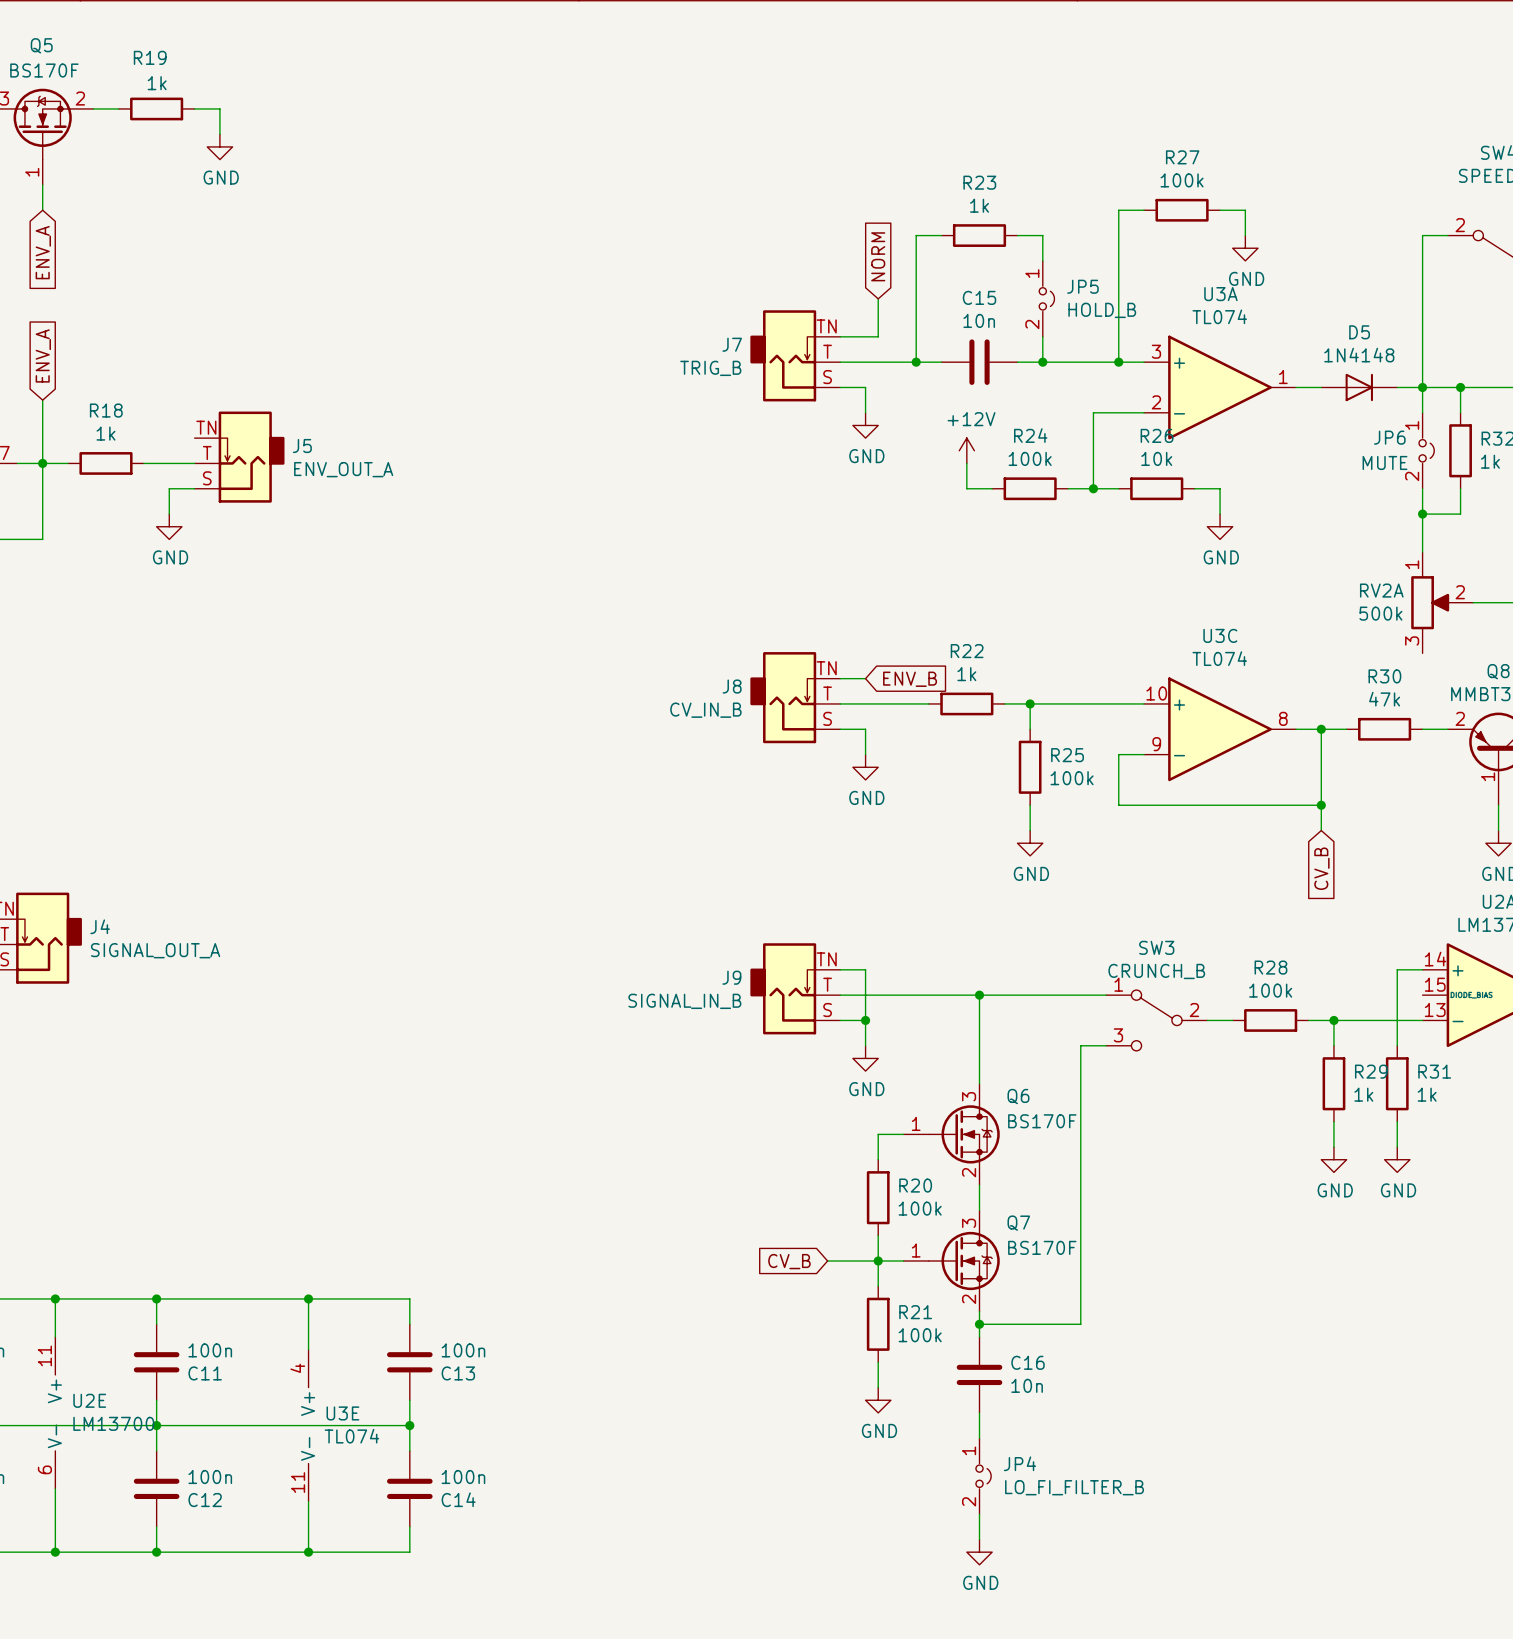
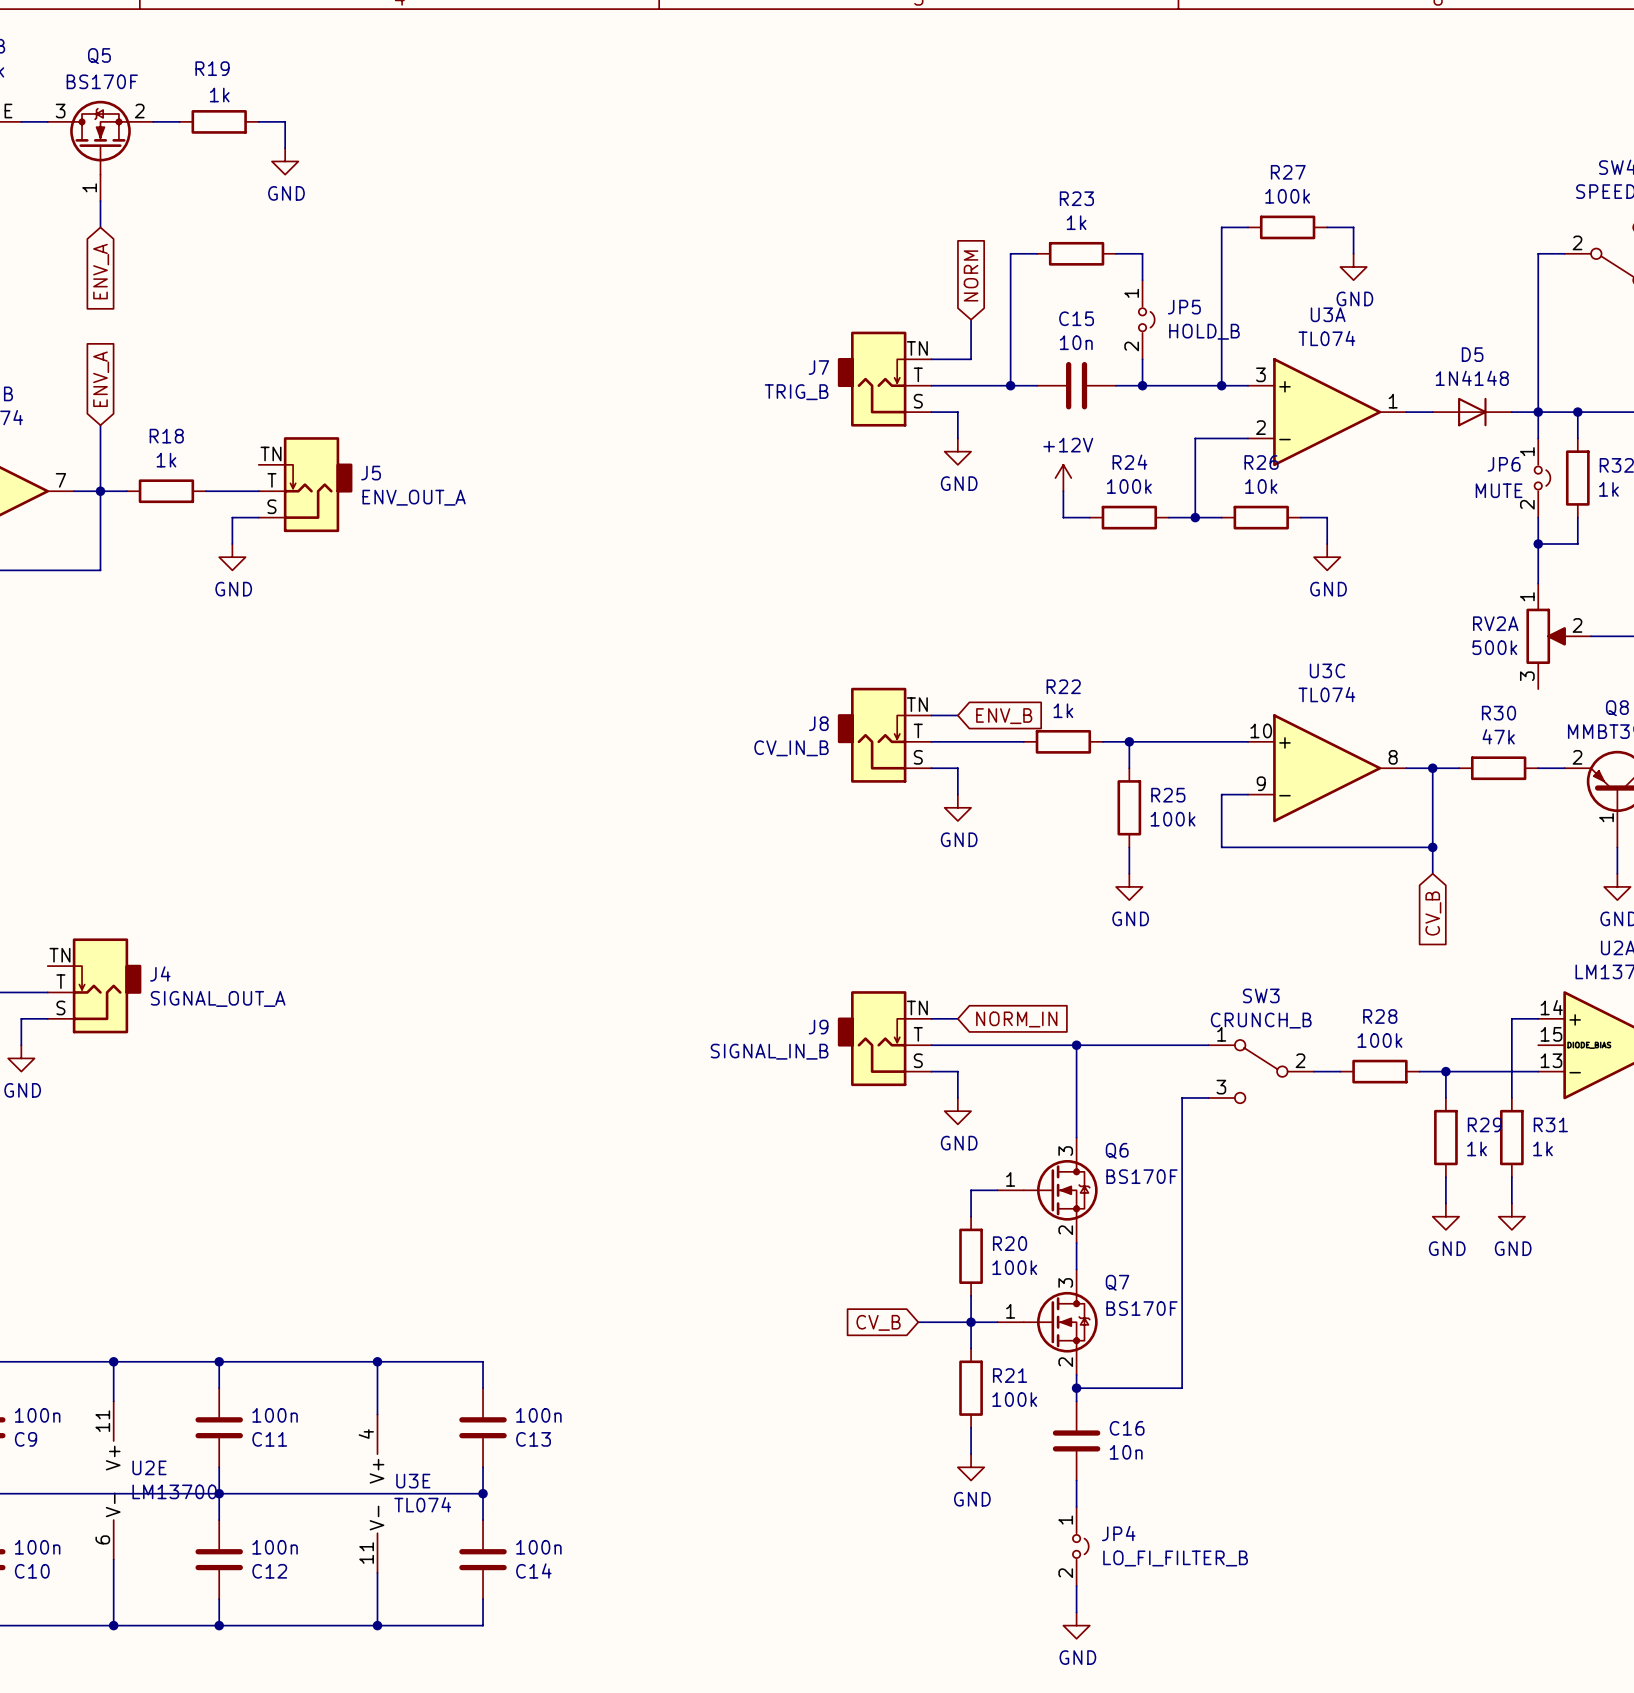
wire: (865, 969) (865, 1020) -> none
global label: none -> NORM_IN (1016, 1019)
junction: (865, 1020) -> none

